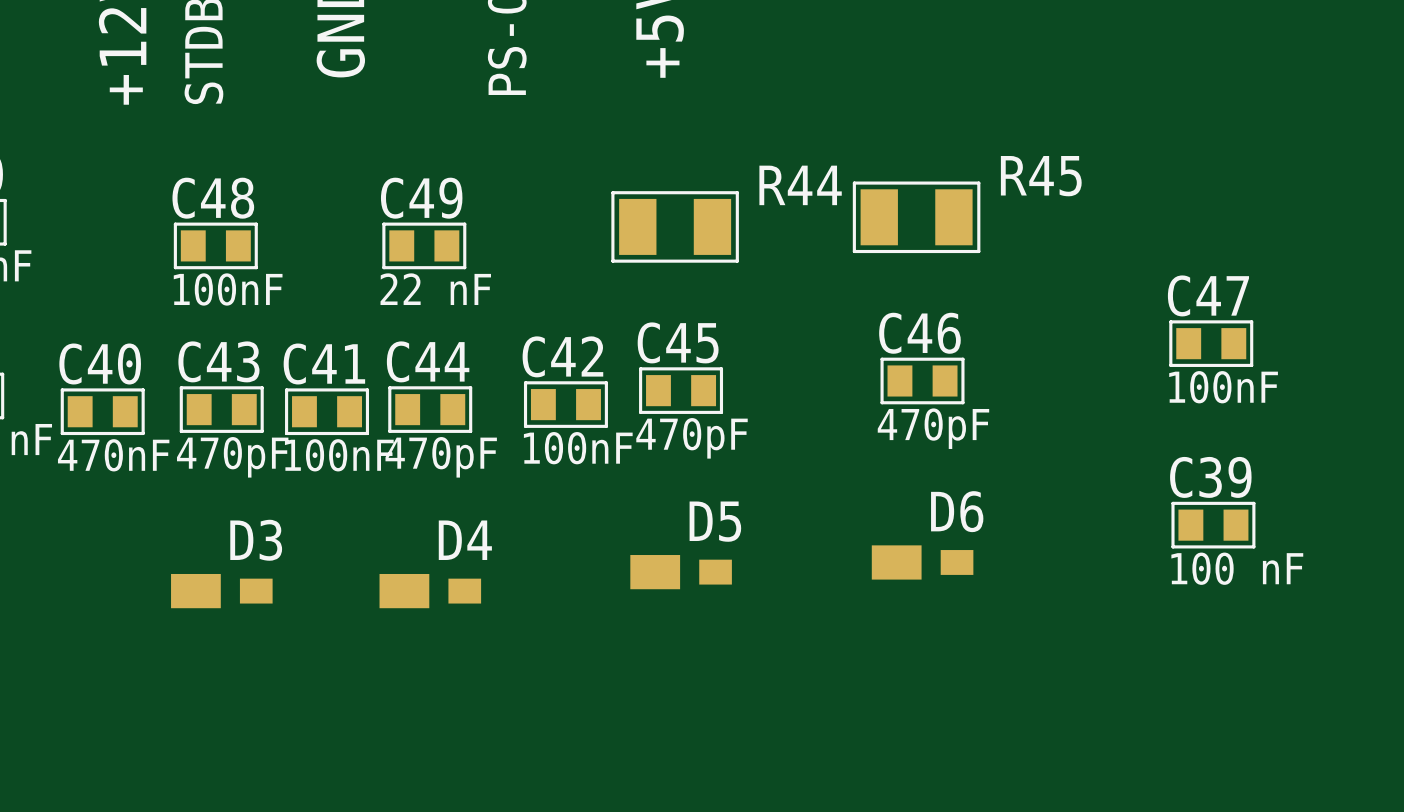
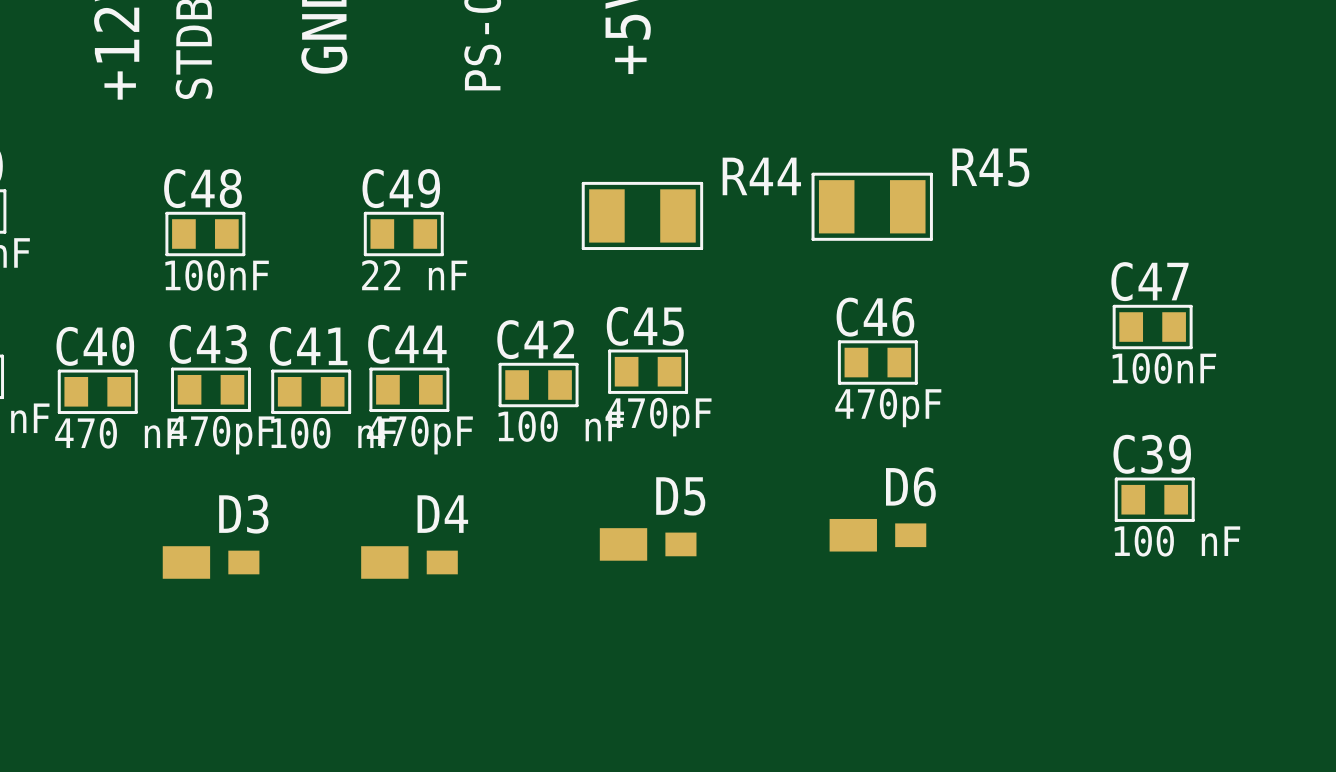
C42 value: 100nF (578, 448) -> 100 nF (561, 426)
C40 value: 470nF (113, 455) -> 470 nF (119, 433)
C41 value: 100nF (339, 455) -> 100 nF (333, 433)

